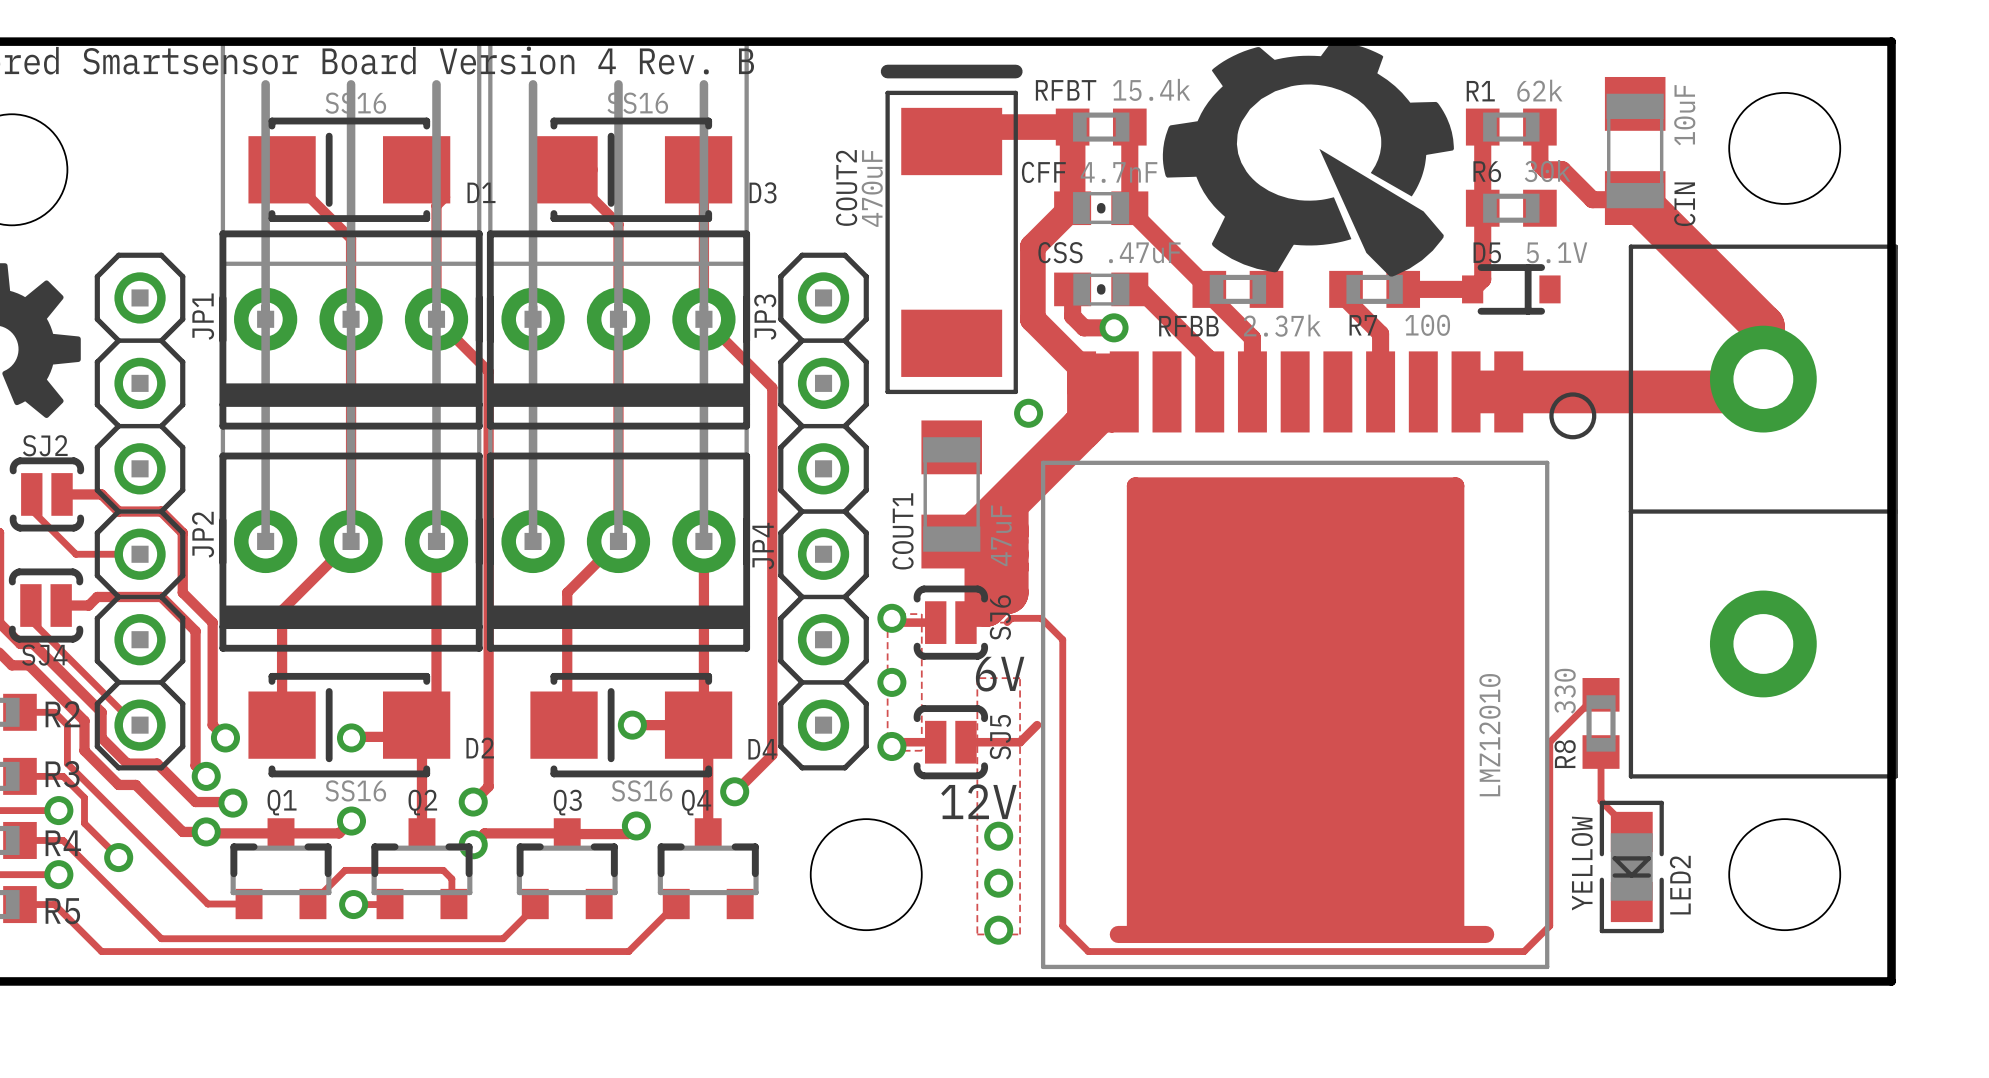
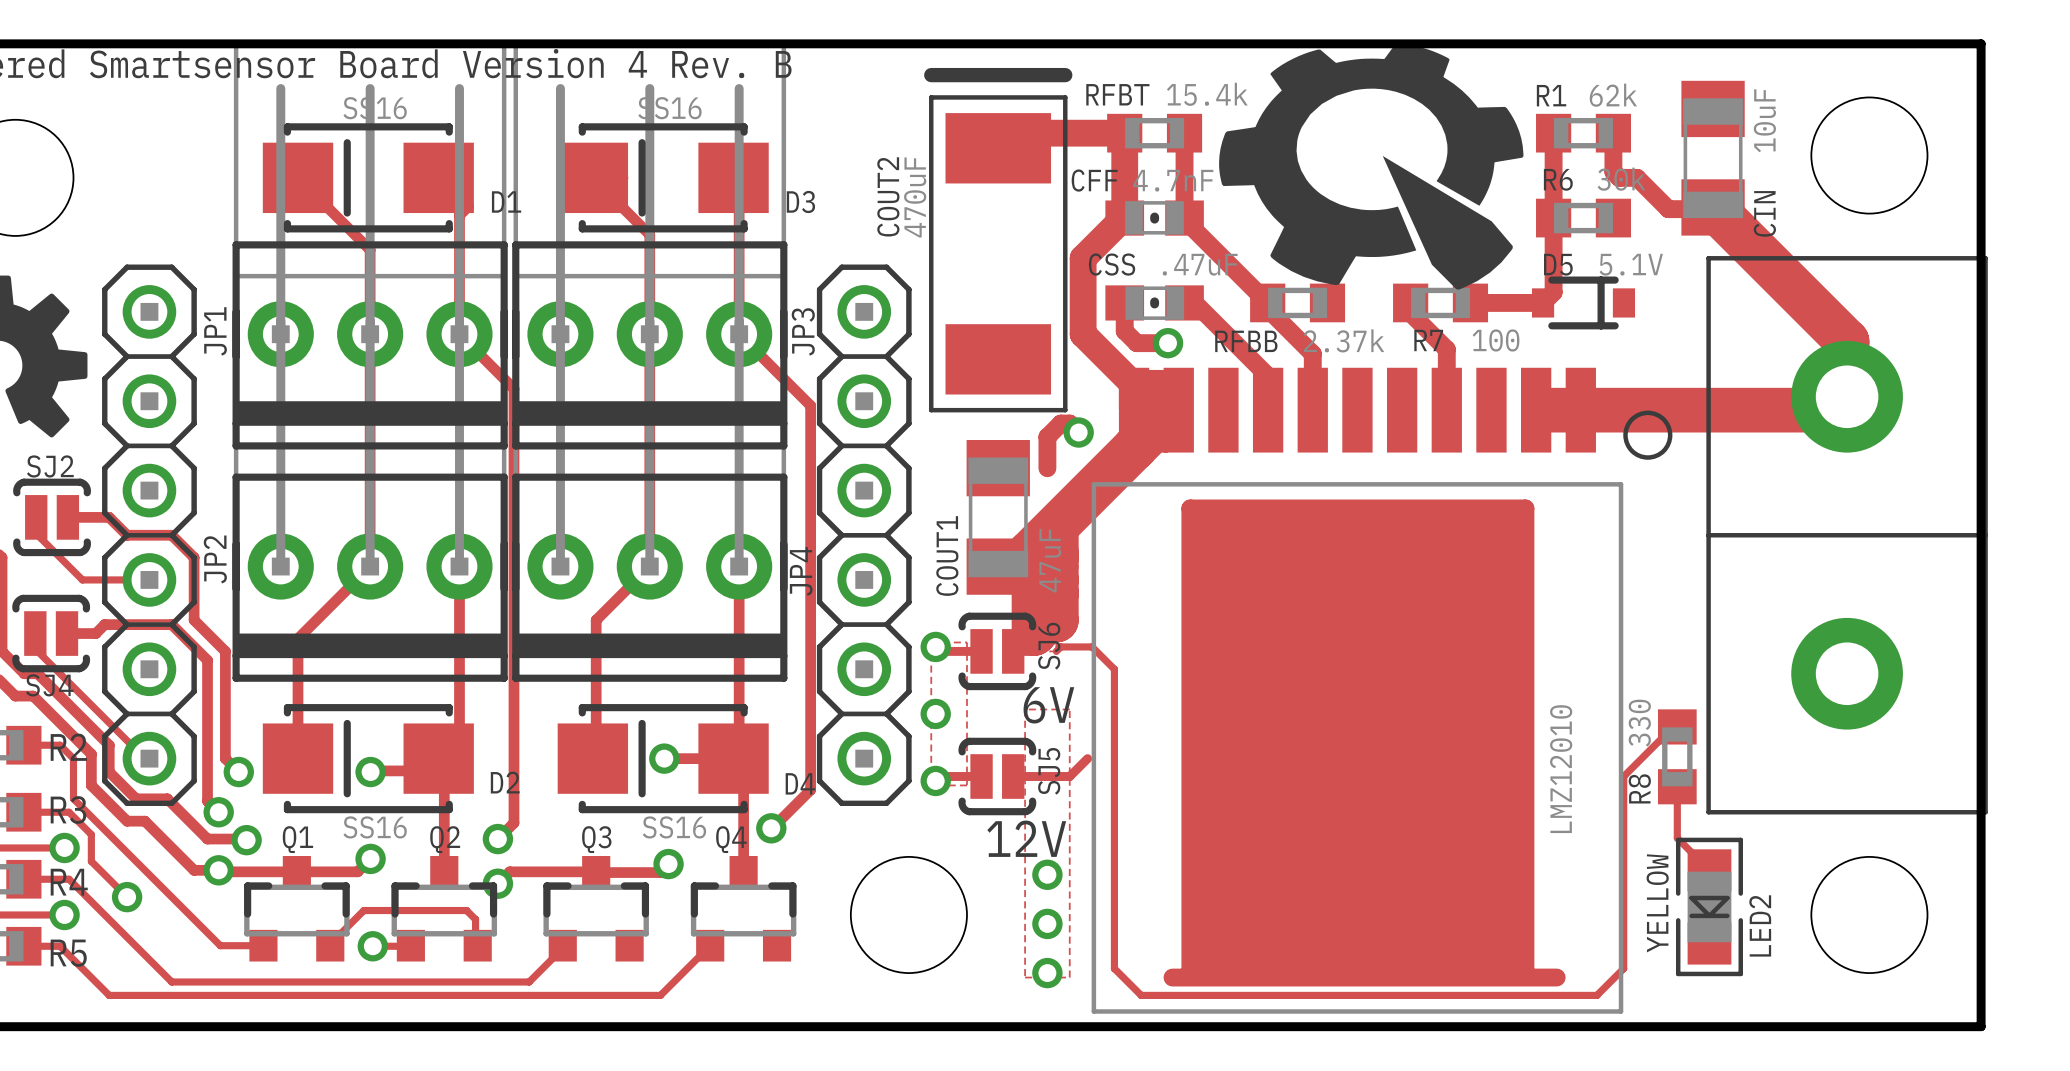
track: none -> (1078, 432) (1069, 423) (1060, 423) (1047, 436) (1047, 468)

